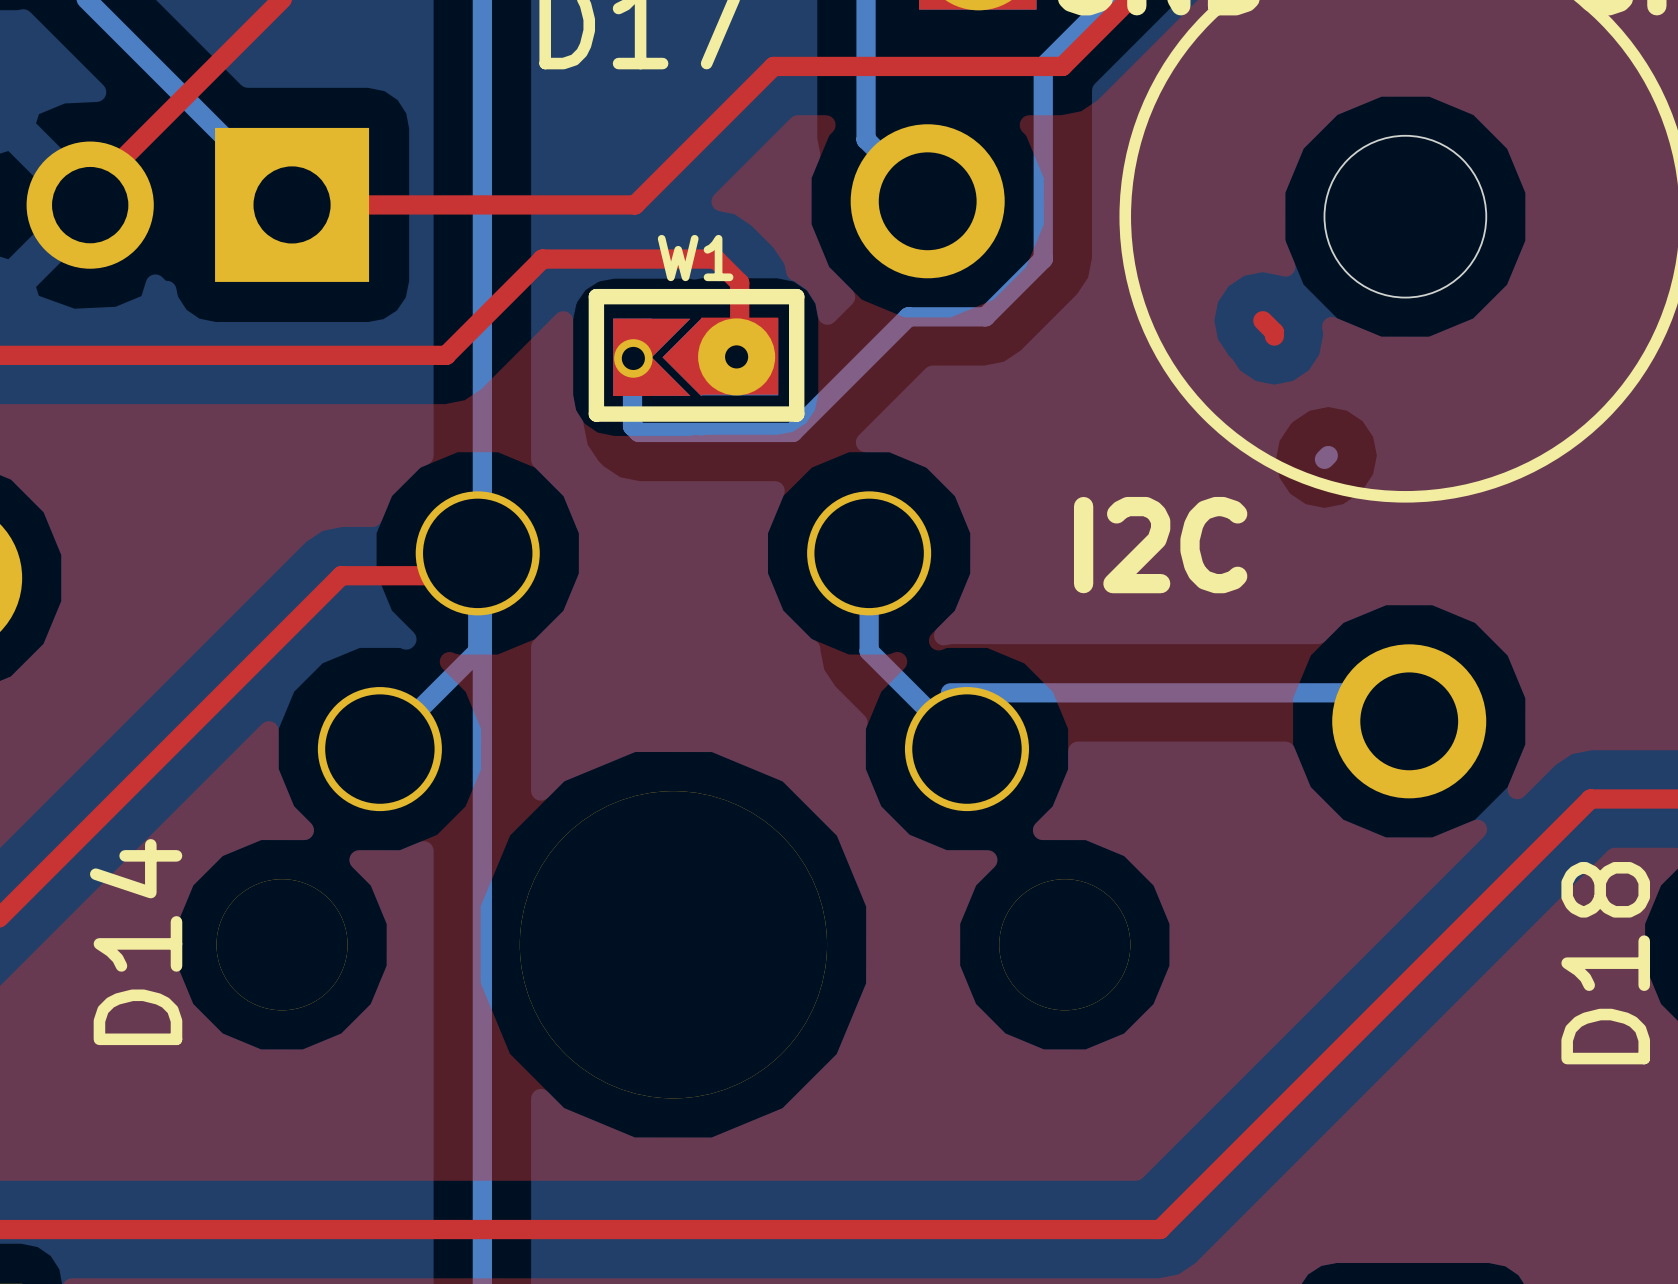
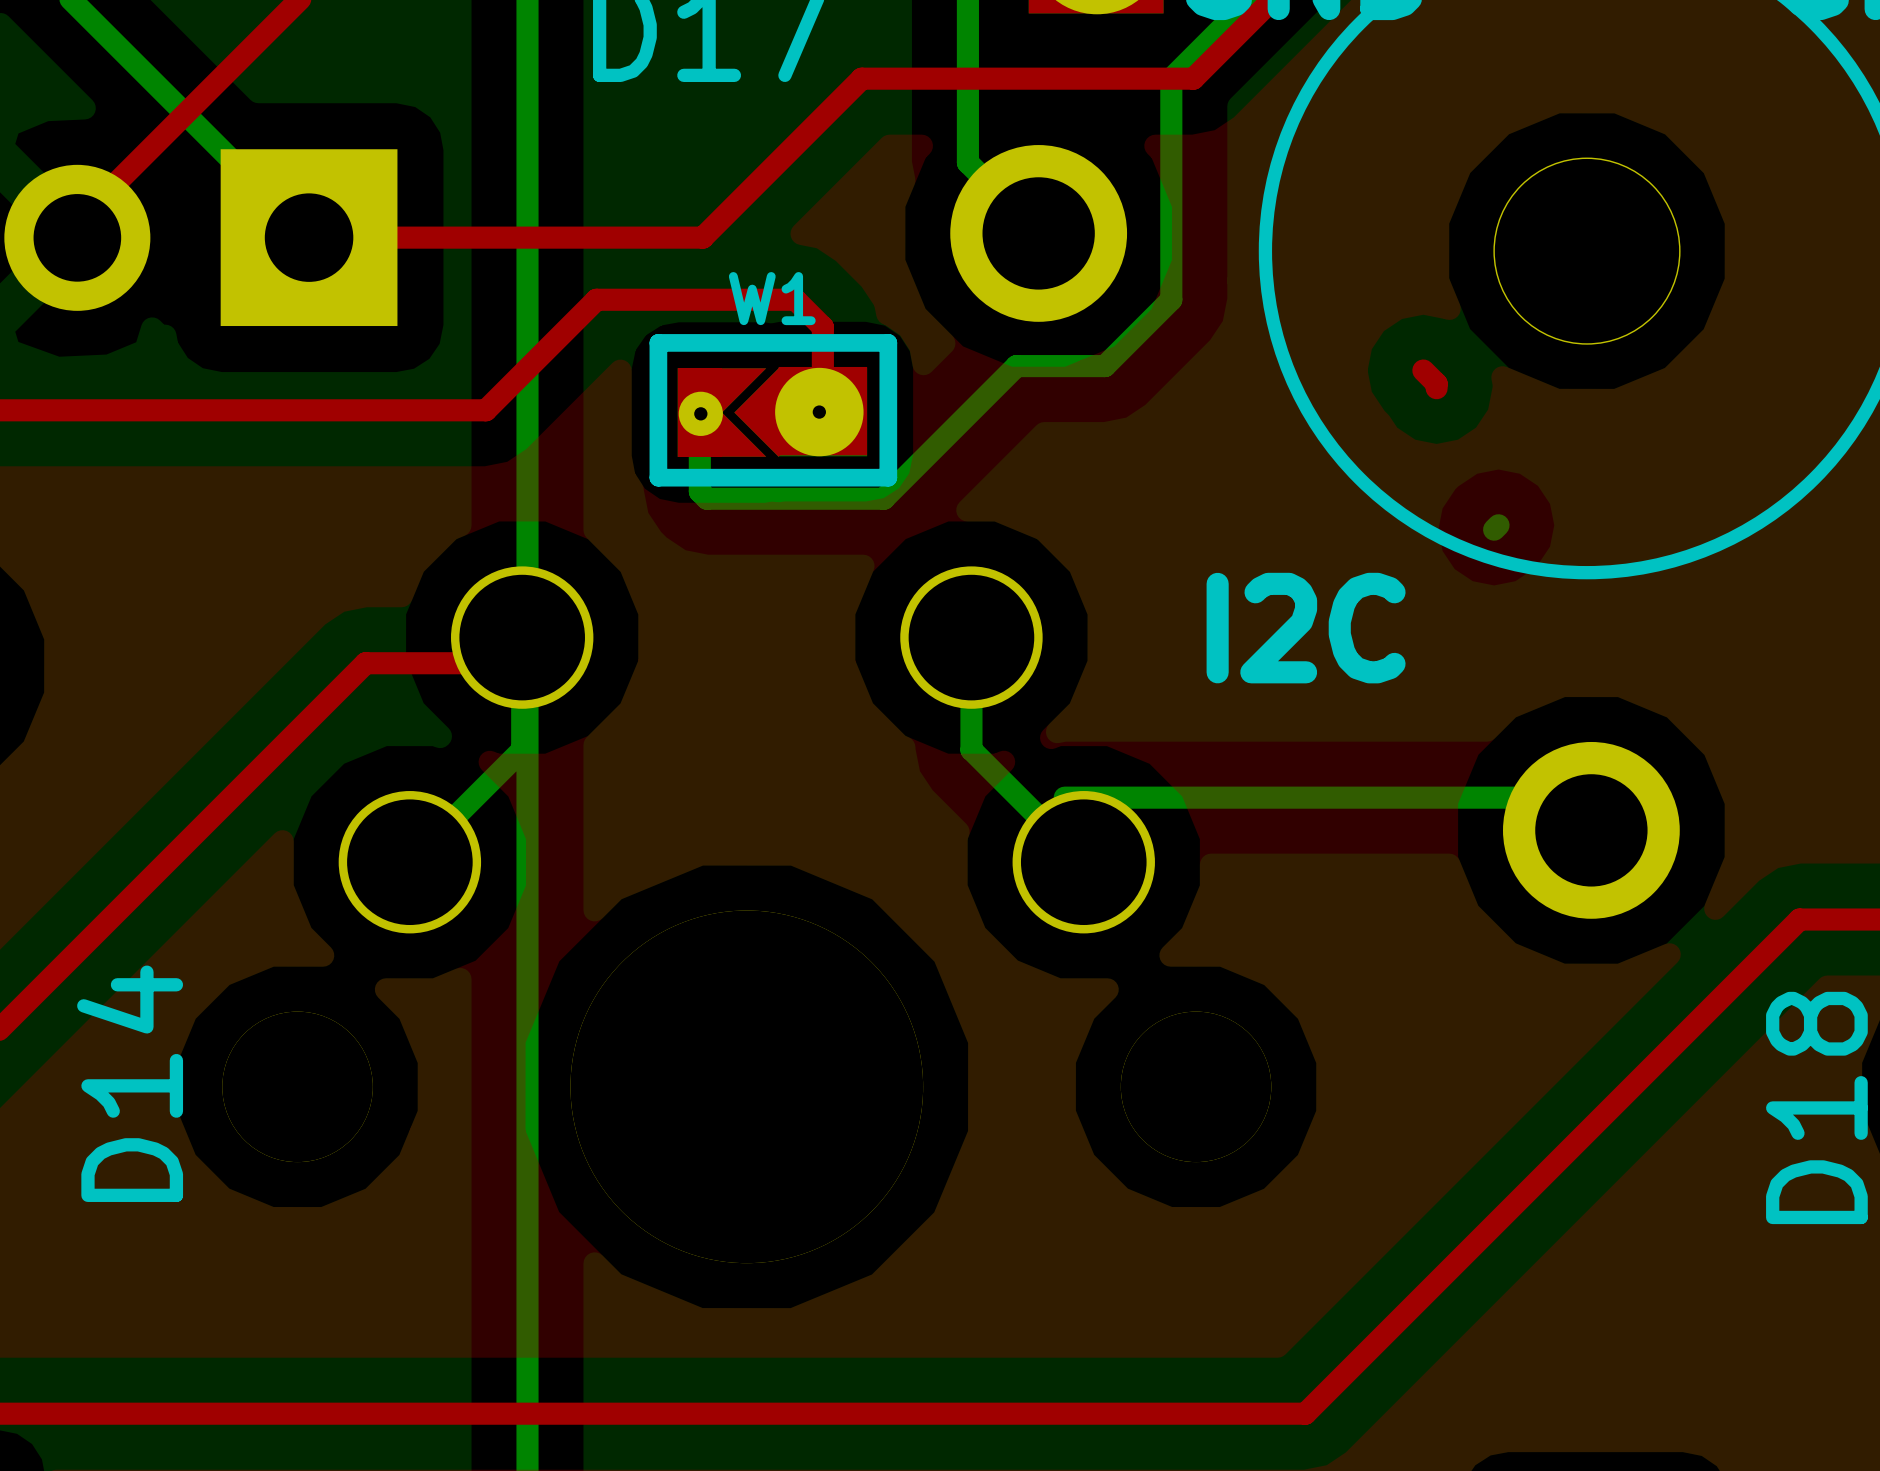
W1 footprint: [588, 288, 805, 422] -> [649, 334, 898, 487]

